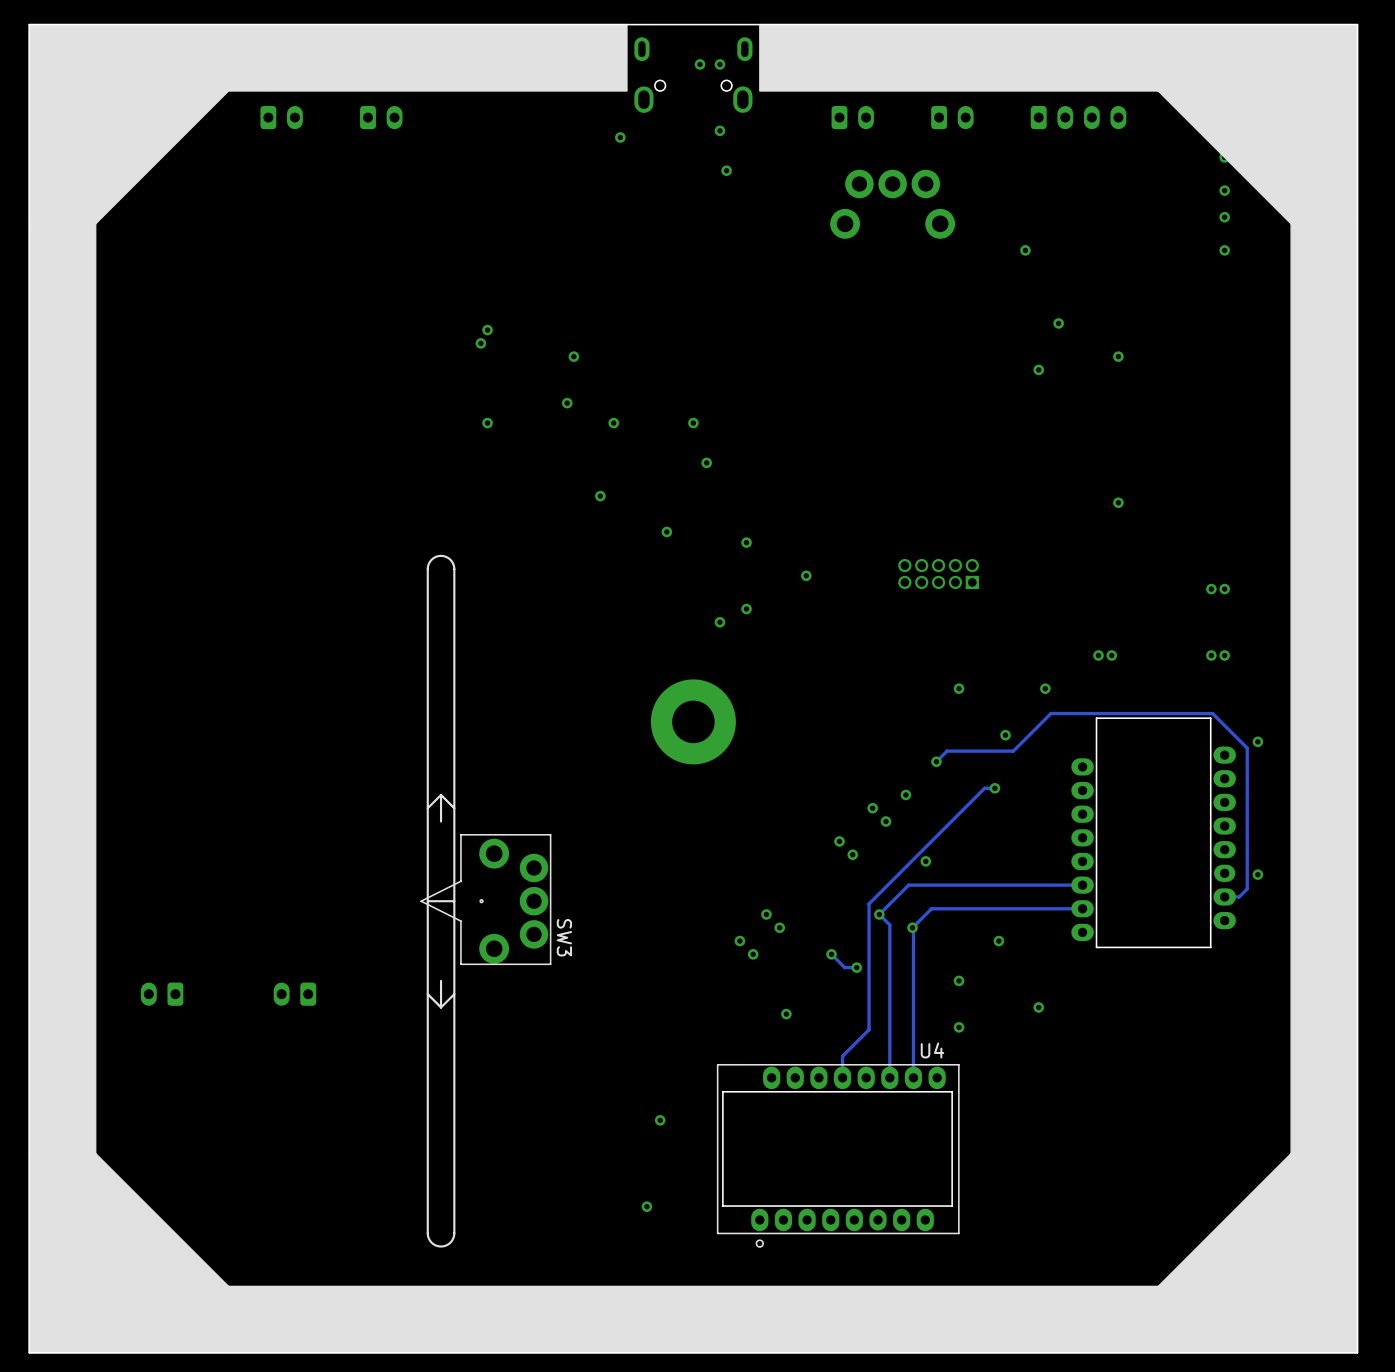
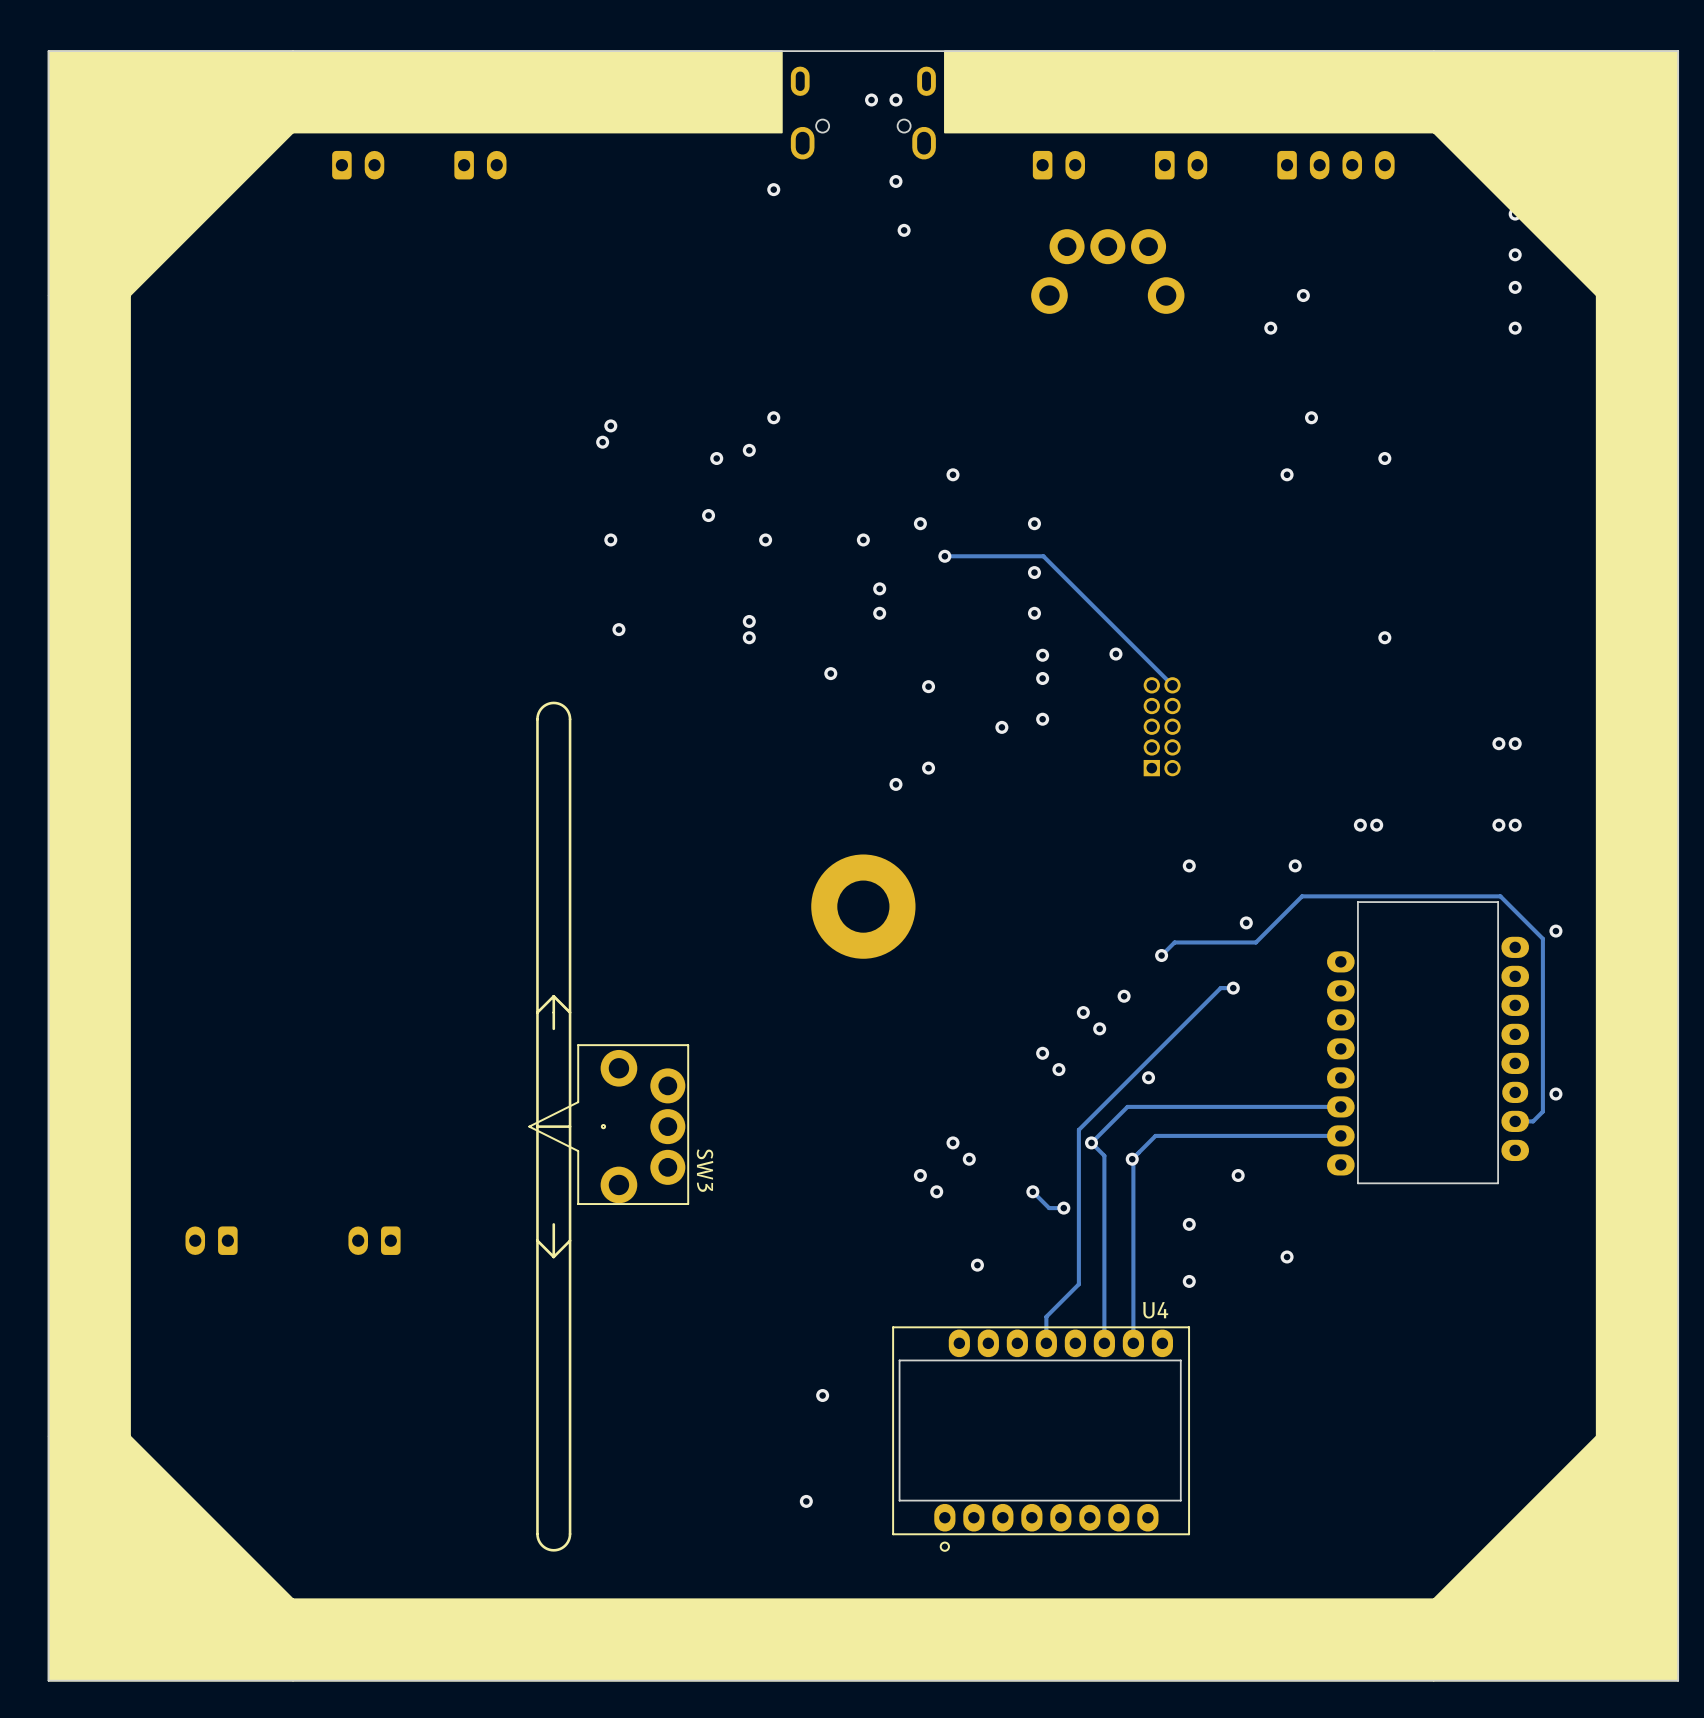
via: none -> (1303, 295)
via: none -> (773, 417)
via: none -> (749, 450)
via: none -> (953, 474)
via: none -> (920, 523)
via: none -> (1034, 523)
track: none -> (944, 556) (1043, 556) (1172, 685)
via: none -> (944, 556)
via: none -> (1034, 572)
via: none -> (879, 613)
via: none -> (1034, 613)
via: none -> (749, 621)
via: none -> (618, 629)
via: (600, 496) -> none
via: none -> (749, 637)
via: none -> (1115, 654)
via: none -> (1042, 655)
via: none -> (1042, 678)
via: none -> (1042, 719)
part rotation: 0° (938, 574) -> 90° clockwise (1162, 726)

